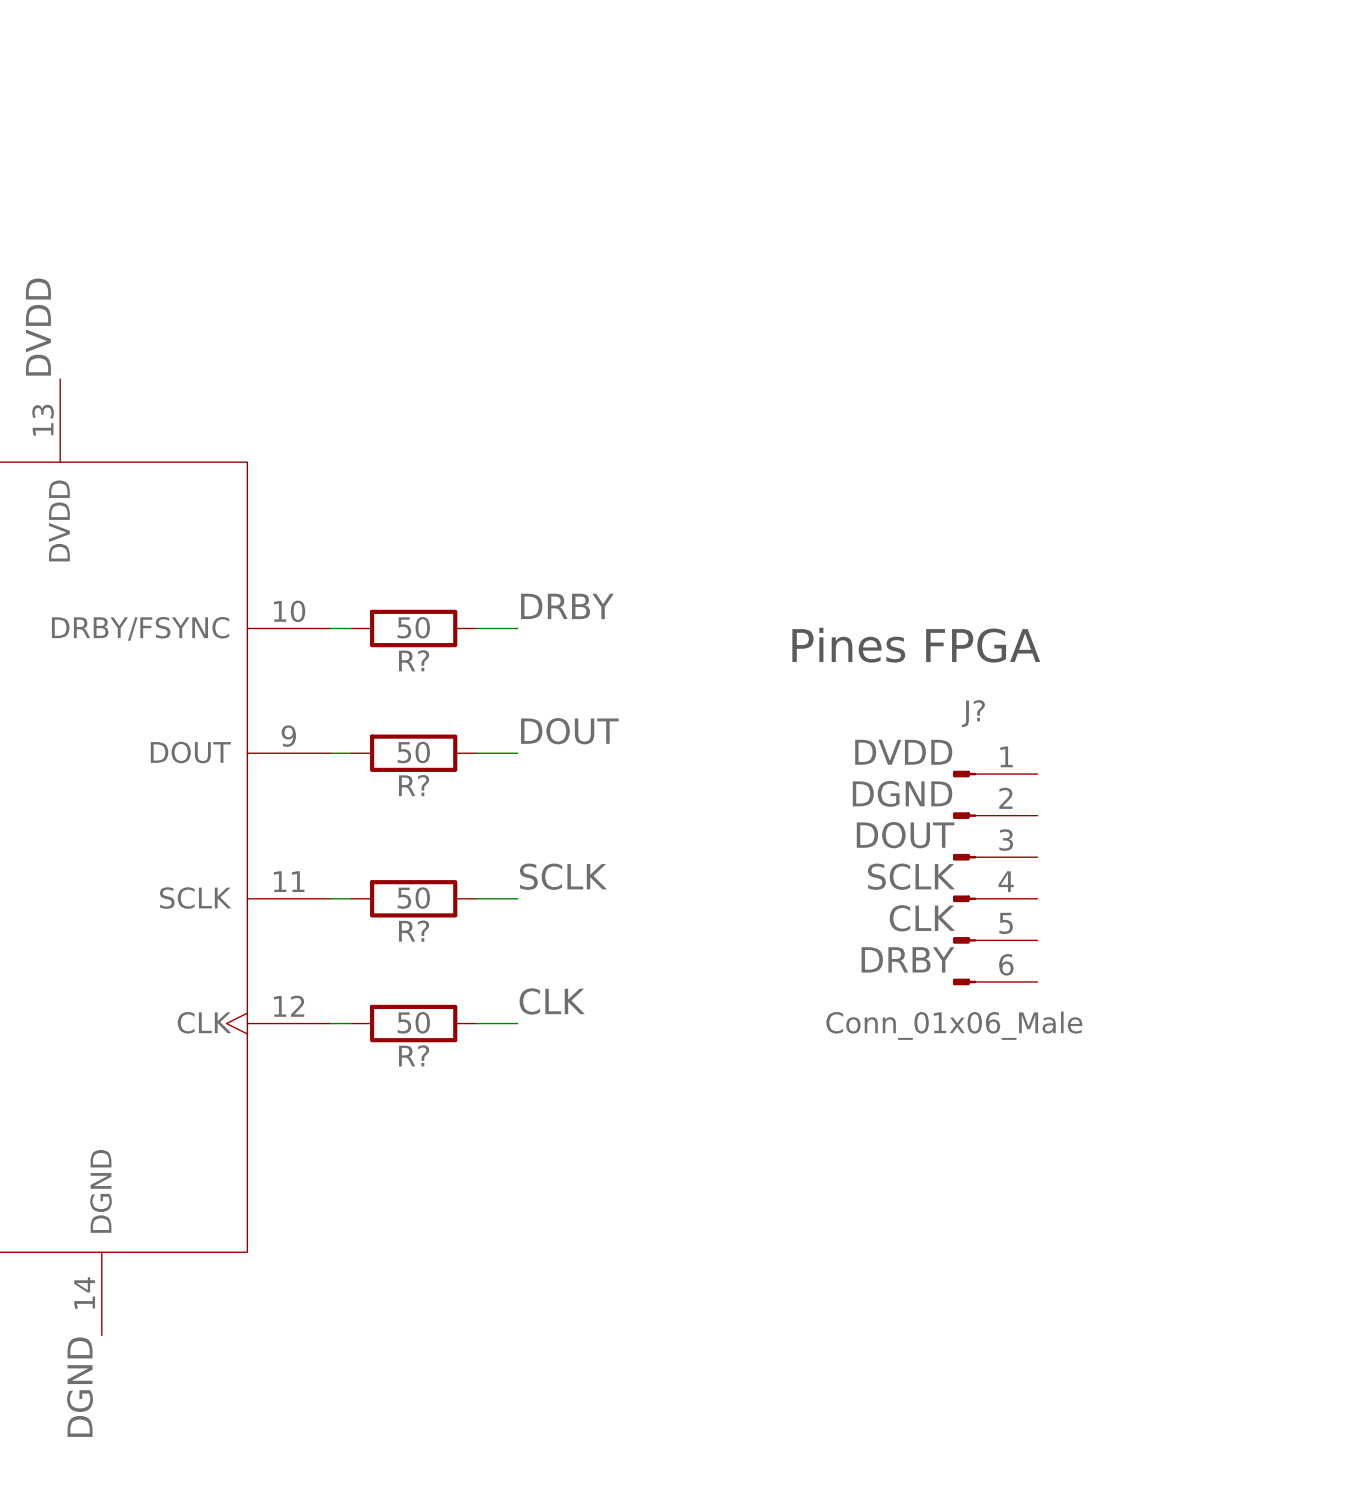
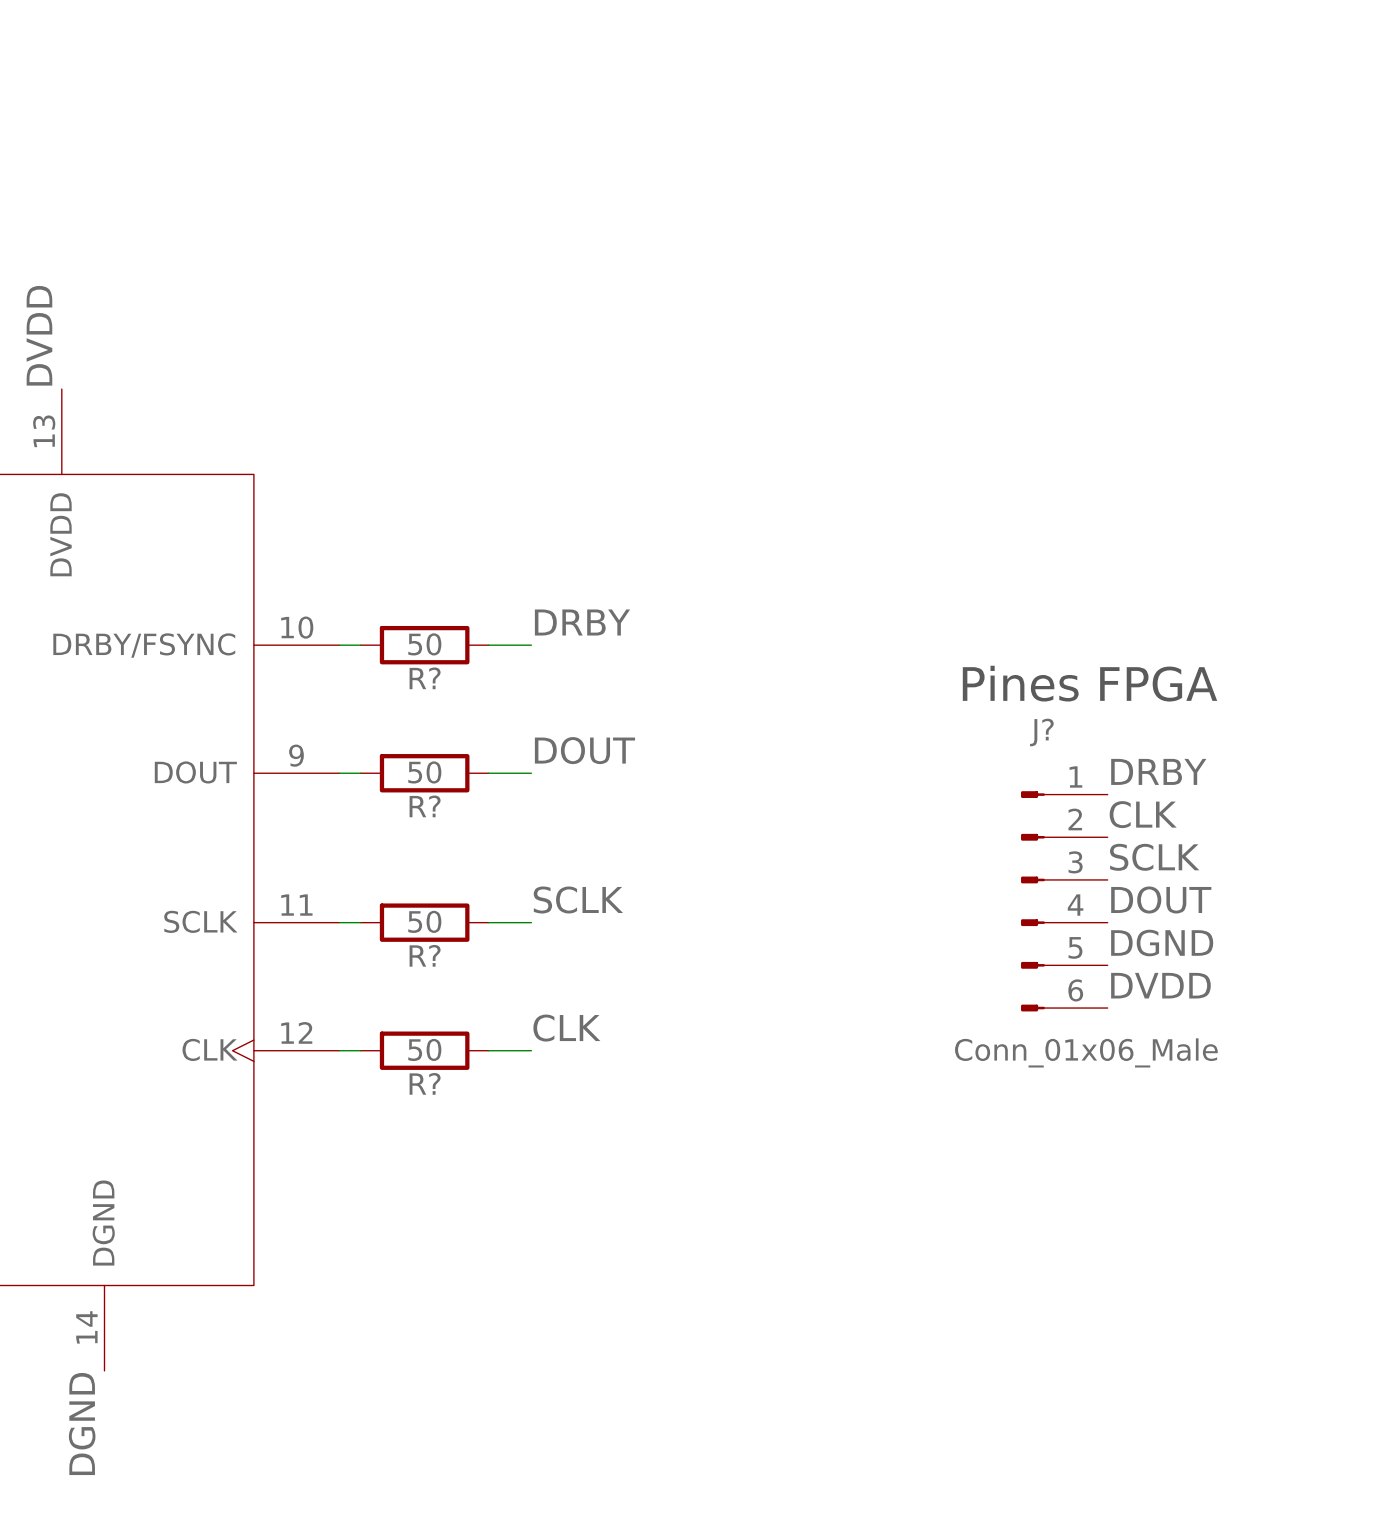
text position: Pines FPGA (916, 645) -> Pines FPGA (1090, 683)
label position: DVDD (903, 752) -> DVDD (1160, 985)
label position: DGND (902, 793) -> DGND (1162, 943)
label position: DOUT (905, 835) -> DOUT (1161, 899)
label position: SCLK (911, 876) -> SCLK (1154, 857)
J? position: (995, 878) -> (1064, 901)
label position: CLK (922, 918) -> CLK (1143, 814)
label position: DRBY (907, 959) -> DRBY (1158, 771)
J? value position: Conn_01x06_Male (954, 1025) -> Conn_01x06_Male (1086, 1052)

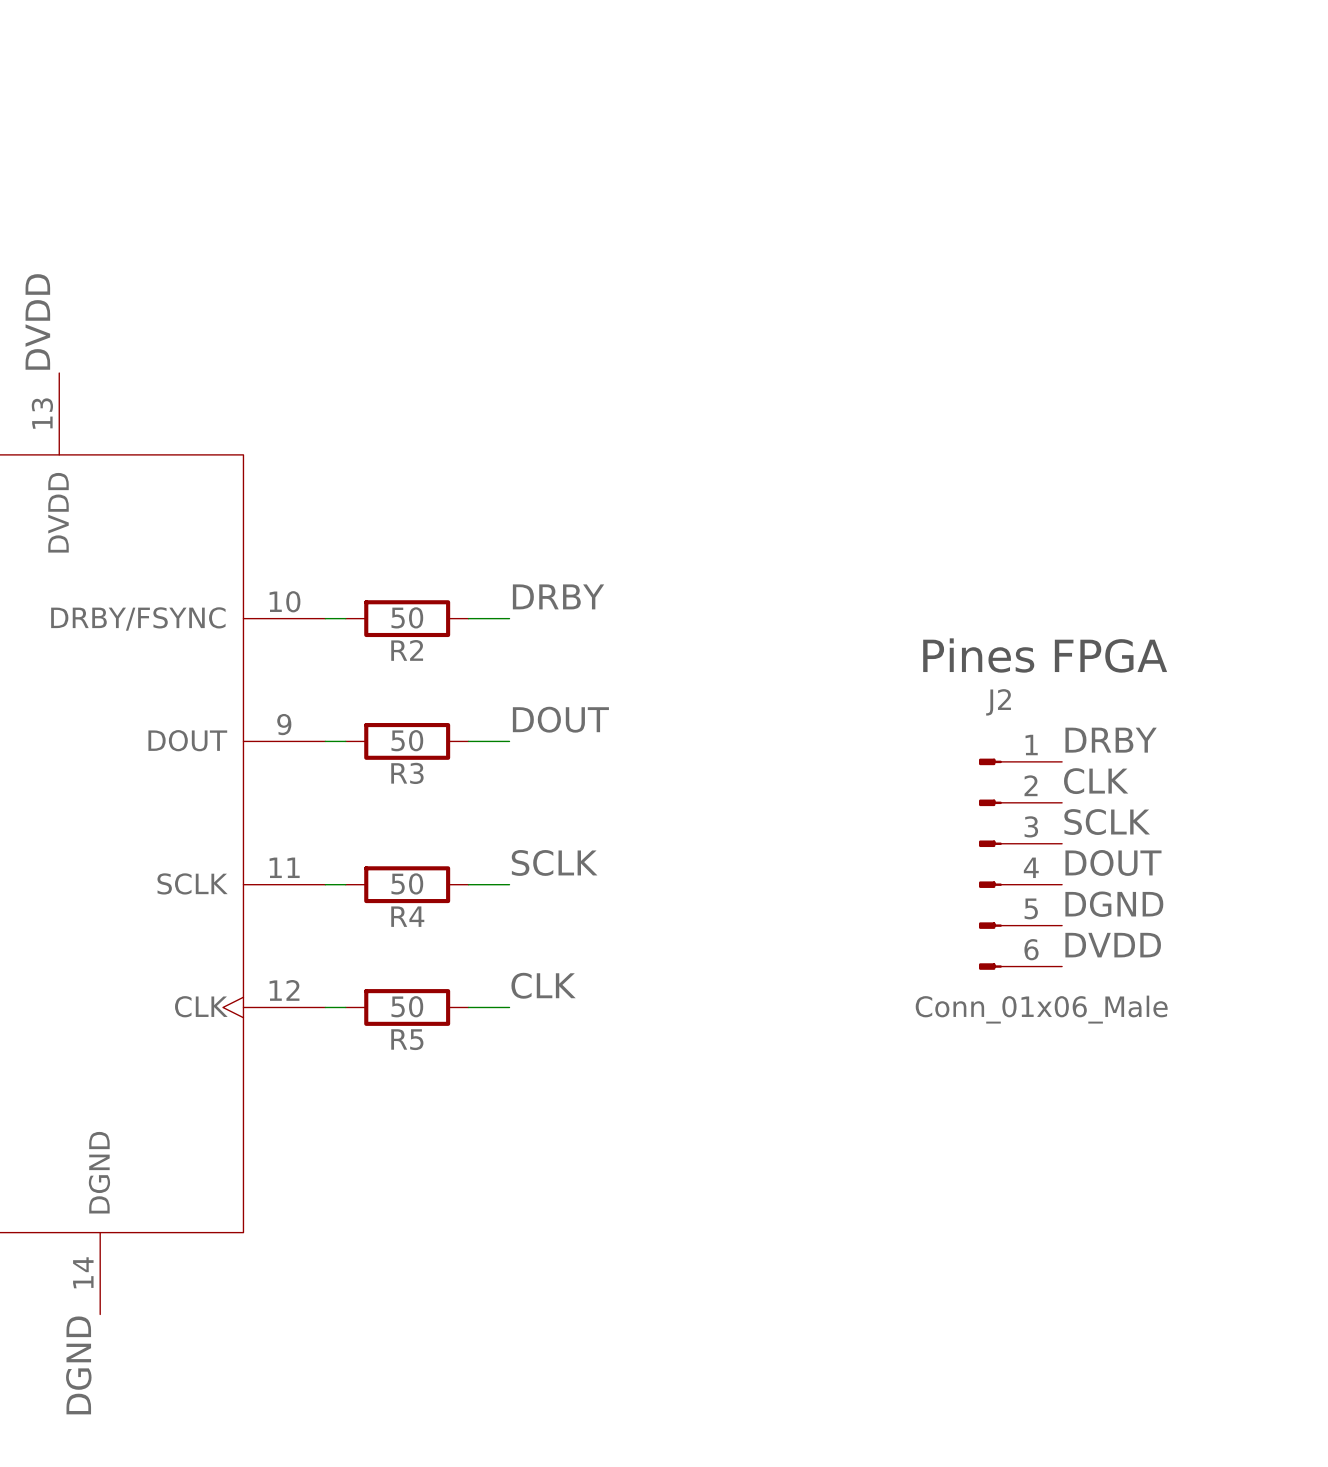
R? name: R? (425, 678) -> R2 (407, 650)
J? name: J? (1041, 732) -> J2 (998, 702)
R? name: R? (425, 806) -> R3 (407, 773)
R? name: R? (425, 955) -> R4 (407, 916)
R? name: R? (425, 1083) -> R5 (407, 1039)

